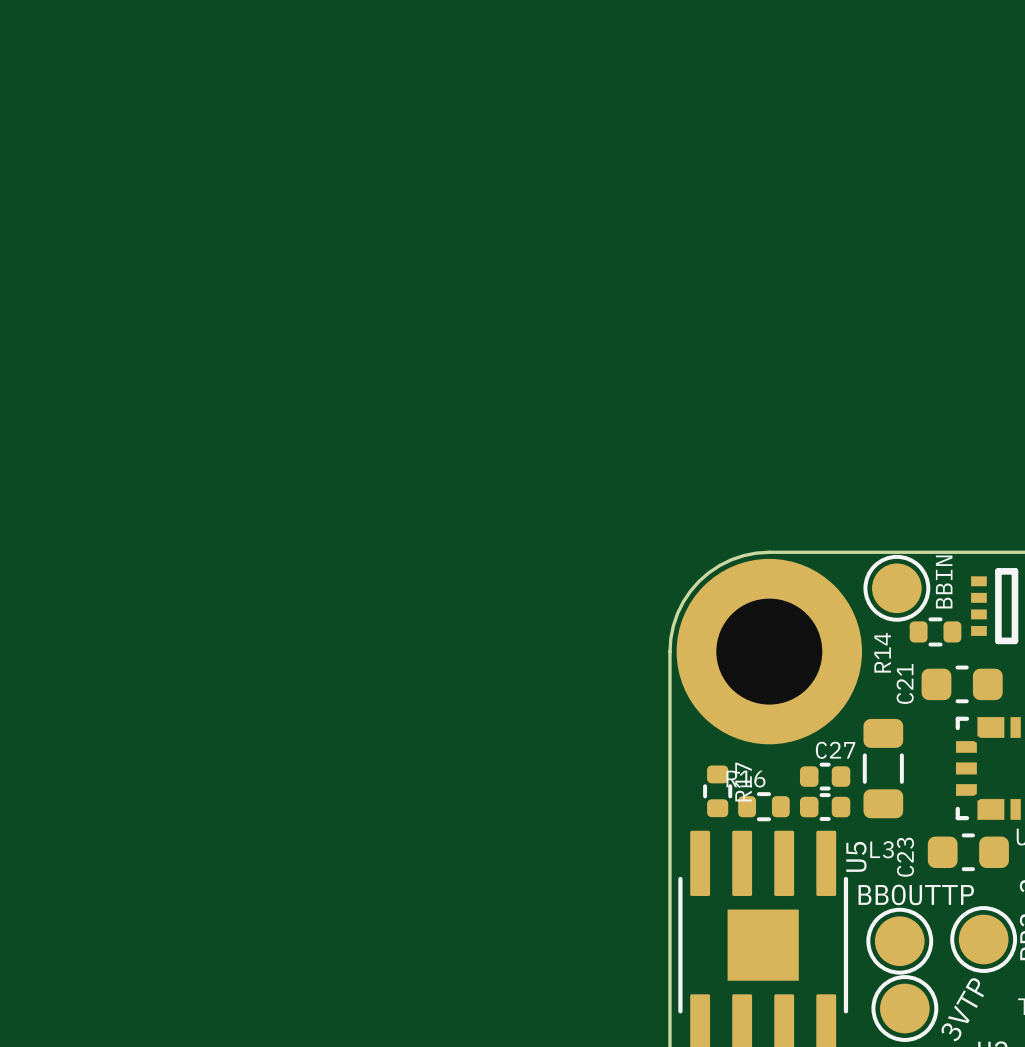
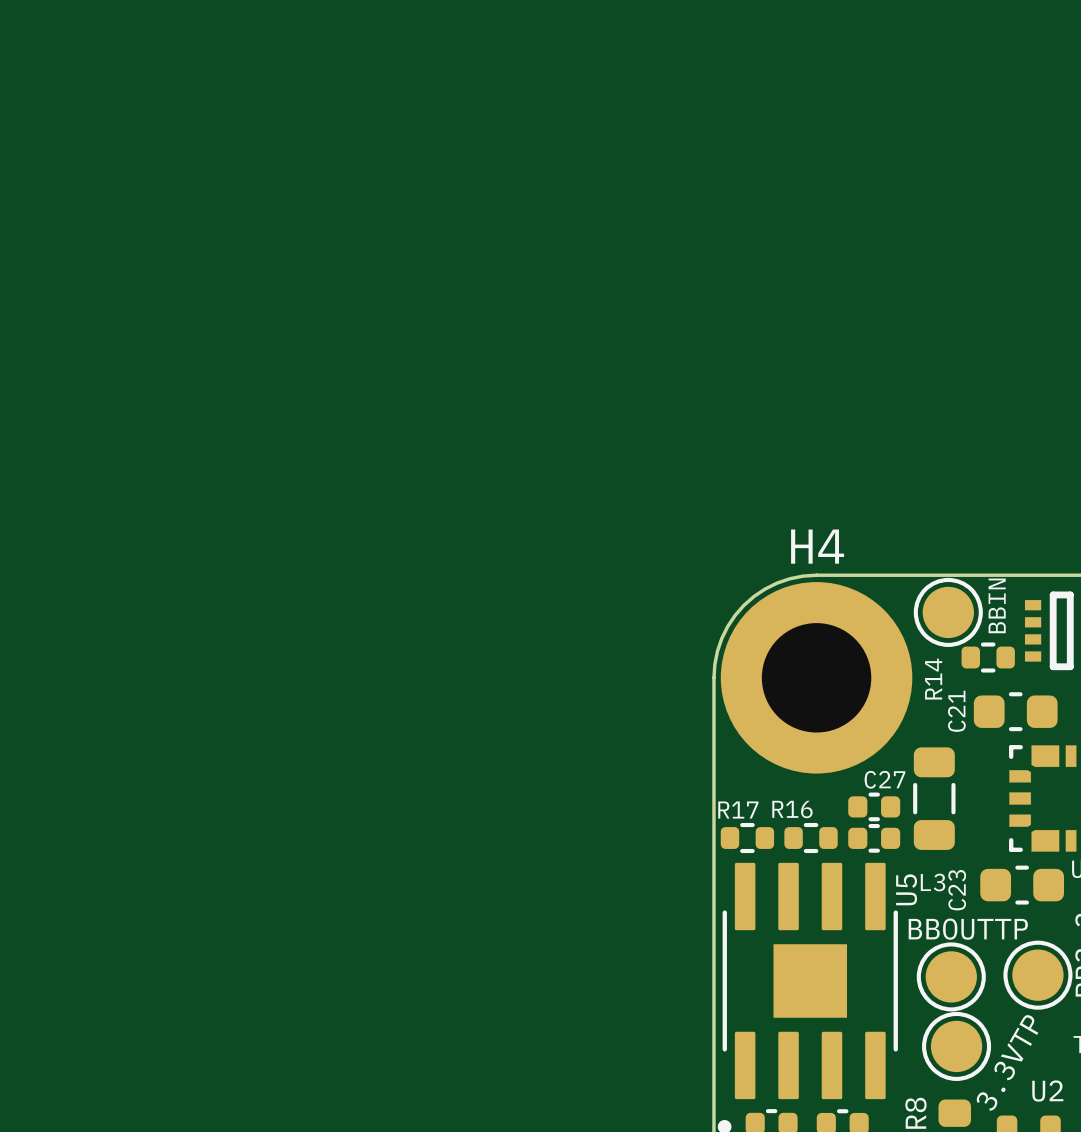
H4 name: none -> H4 (817, 546)
R17 rotation: 0° (717, 791) -> 90° clockwise (747, 838)

